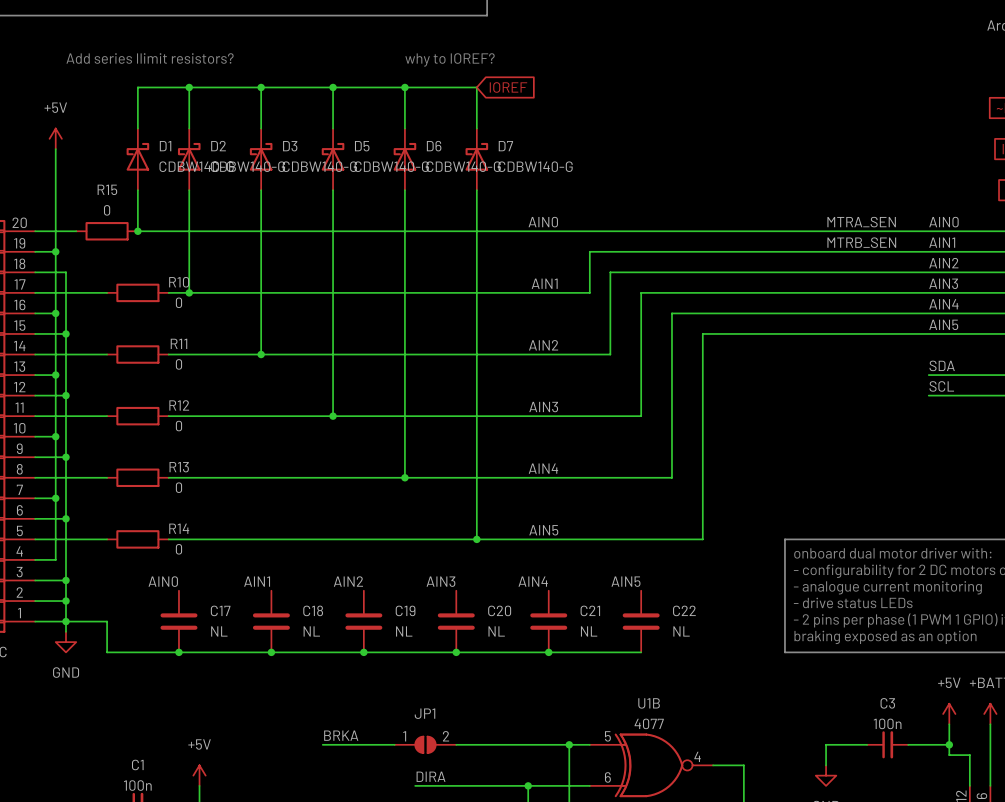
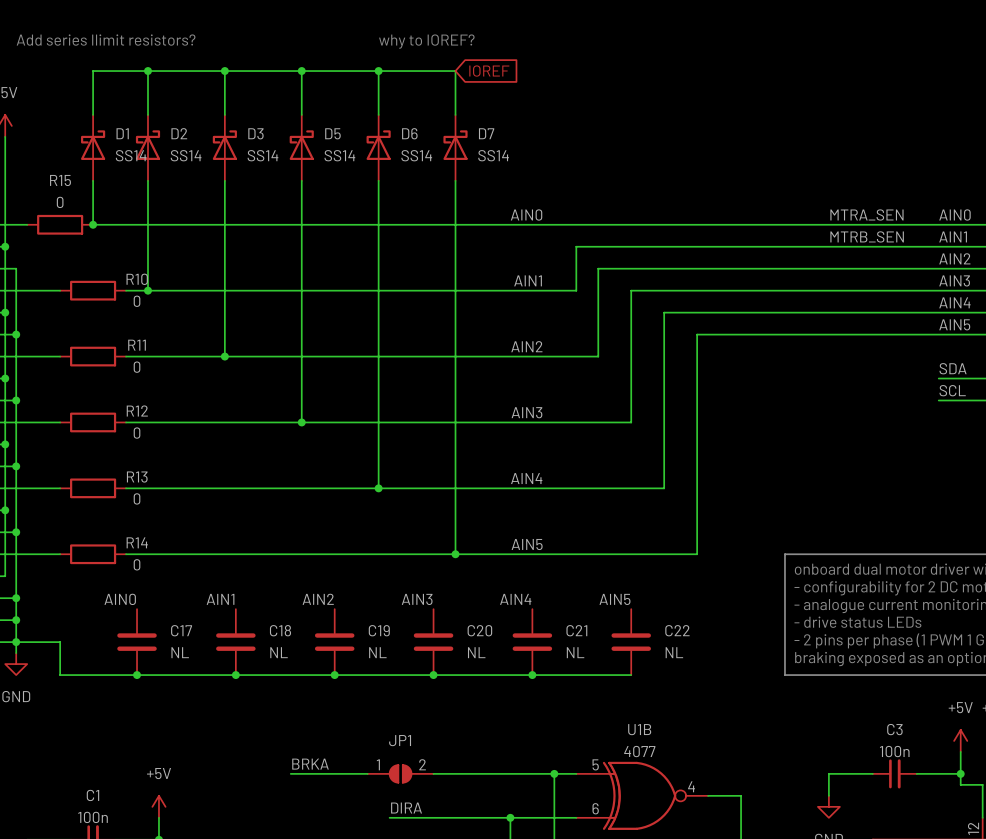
D1 value: CDBW140-G (196, 166) -> SS14 (131, 155)
D2 value: CDBW140-G (247, 166) -> SS14 (186, 155)
D3 value: CDBW140-G (319, 166) -> SS14 (263, 155)
D5 value: CDBW140-G (391, 166) -> SS14 (339, 155)
D6 value: CDBW140-G (463, 166) -> SS14 (416, 155)
D7 value: CDBW140-G (535, 166) -> SS14 (493, 155)

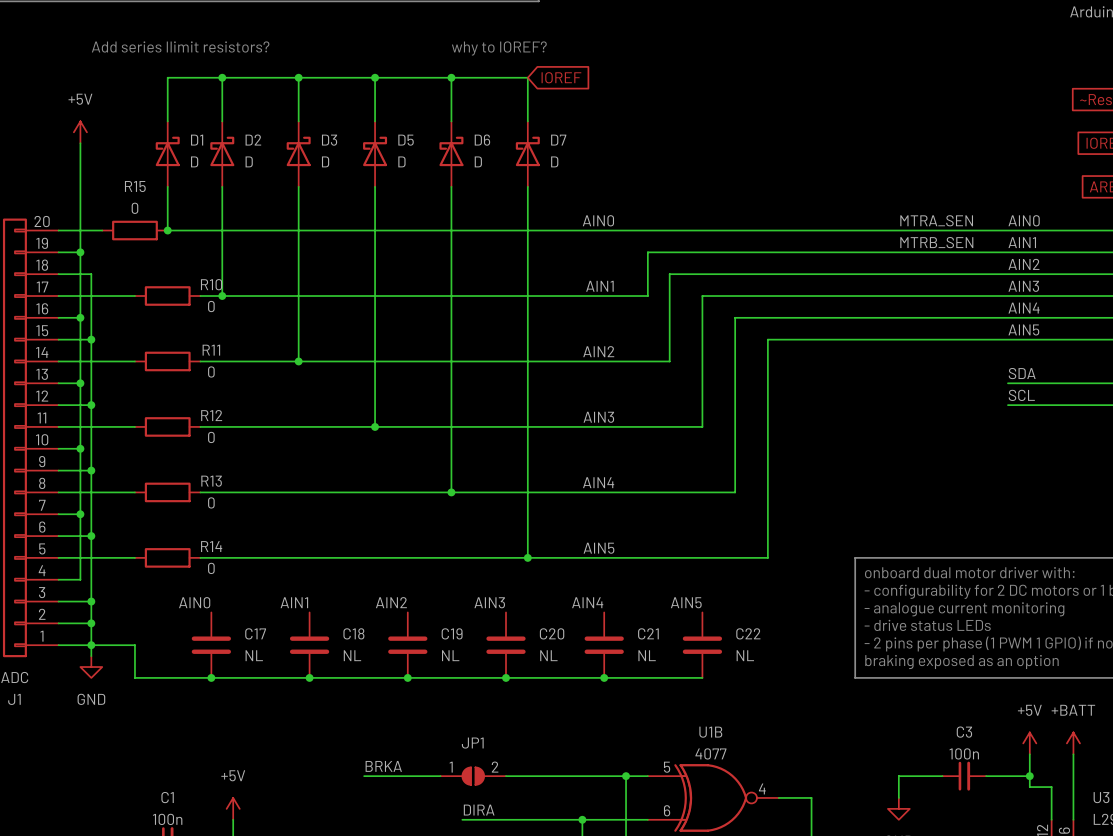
D1 value: SS14 (131, 155) -> D (194, 161)
D2 value: SS14 (186, 155) -> D (249, 161)
D3 value: SS14 (263, 155) -> D (325, 161)
D5 value: SS14 (339, 155) -> D (401, 161)
D6 value: SS14 (416, 155) -> D (478, 161)
D7 value: SS14 (493, 155) -> D (554, 161)

